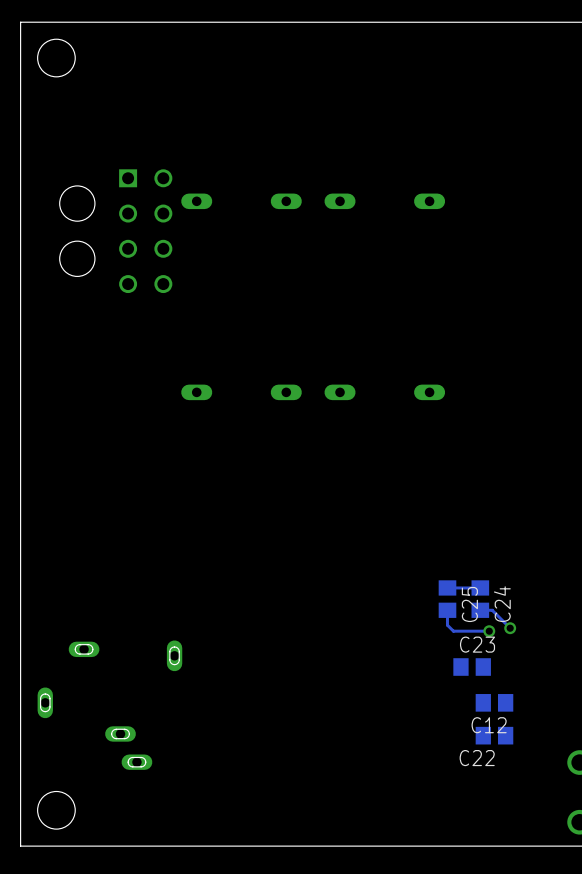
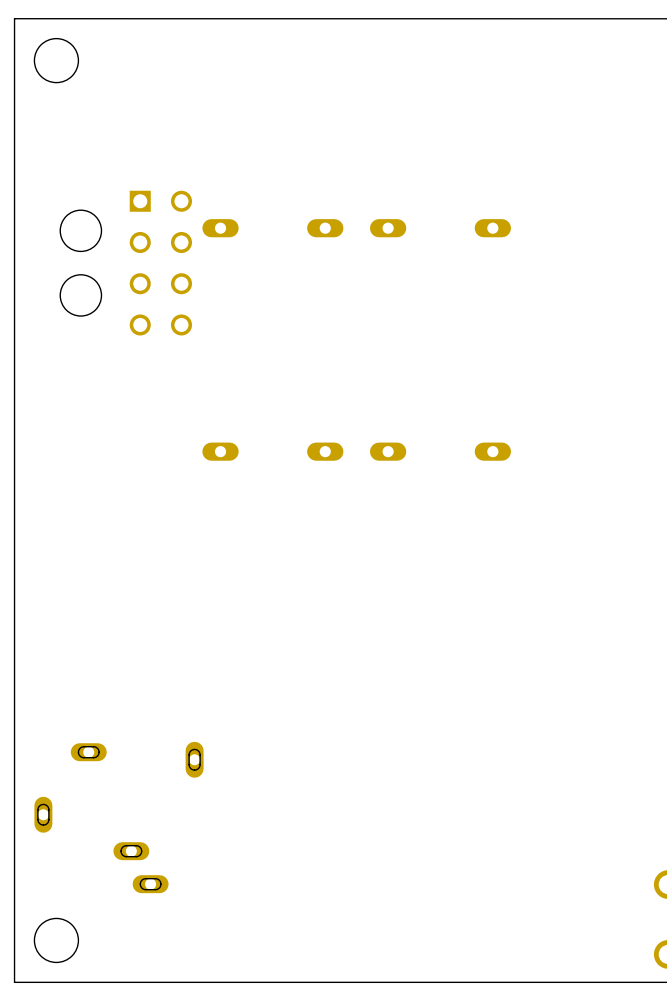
track: (480, 587) (447, 587) -> none
C25: (447, 599) -> none
C24: (480, 599) -> none
track: (447, 610) (447, 625) (453, 631) (489, 631) -> none
track: (480, 610) (492, 610) (510, 628) -> none
via: (510, 628) -> none
via: (489, 631) -> none
C23: (472, 667) -> none
C12: (494, 702) -> none
C22: (494, 735) -> none

